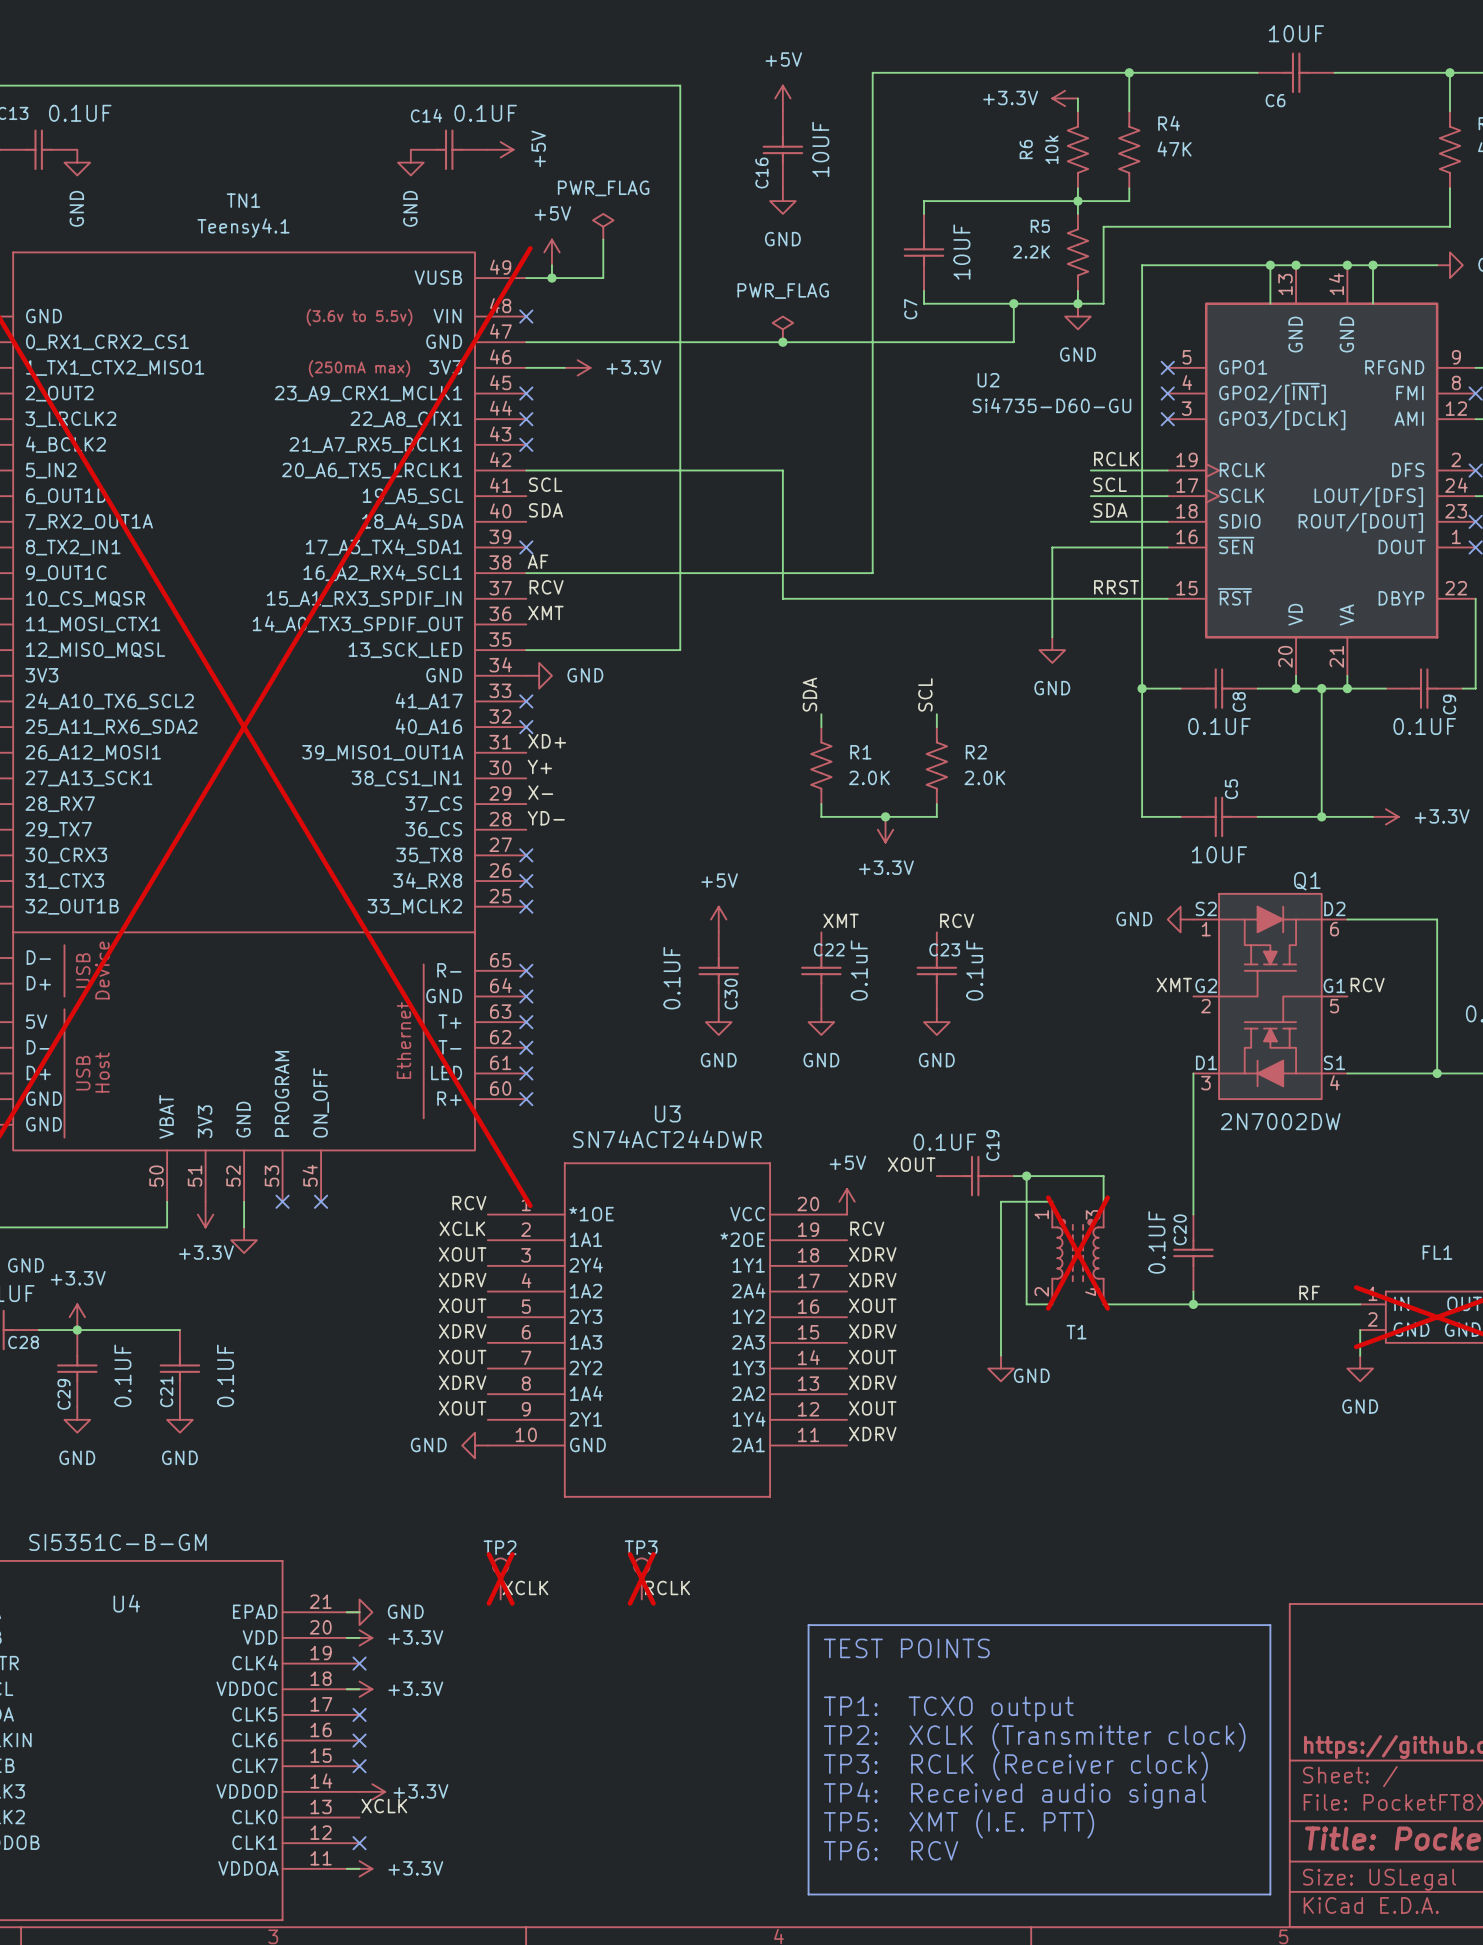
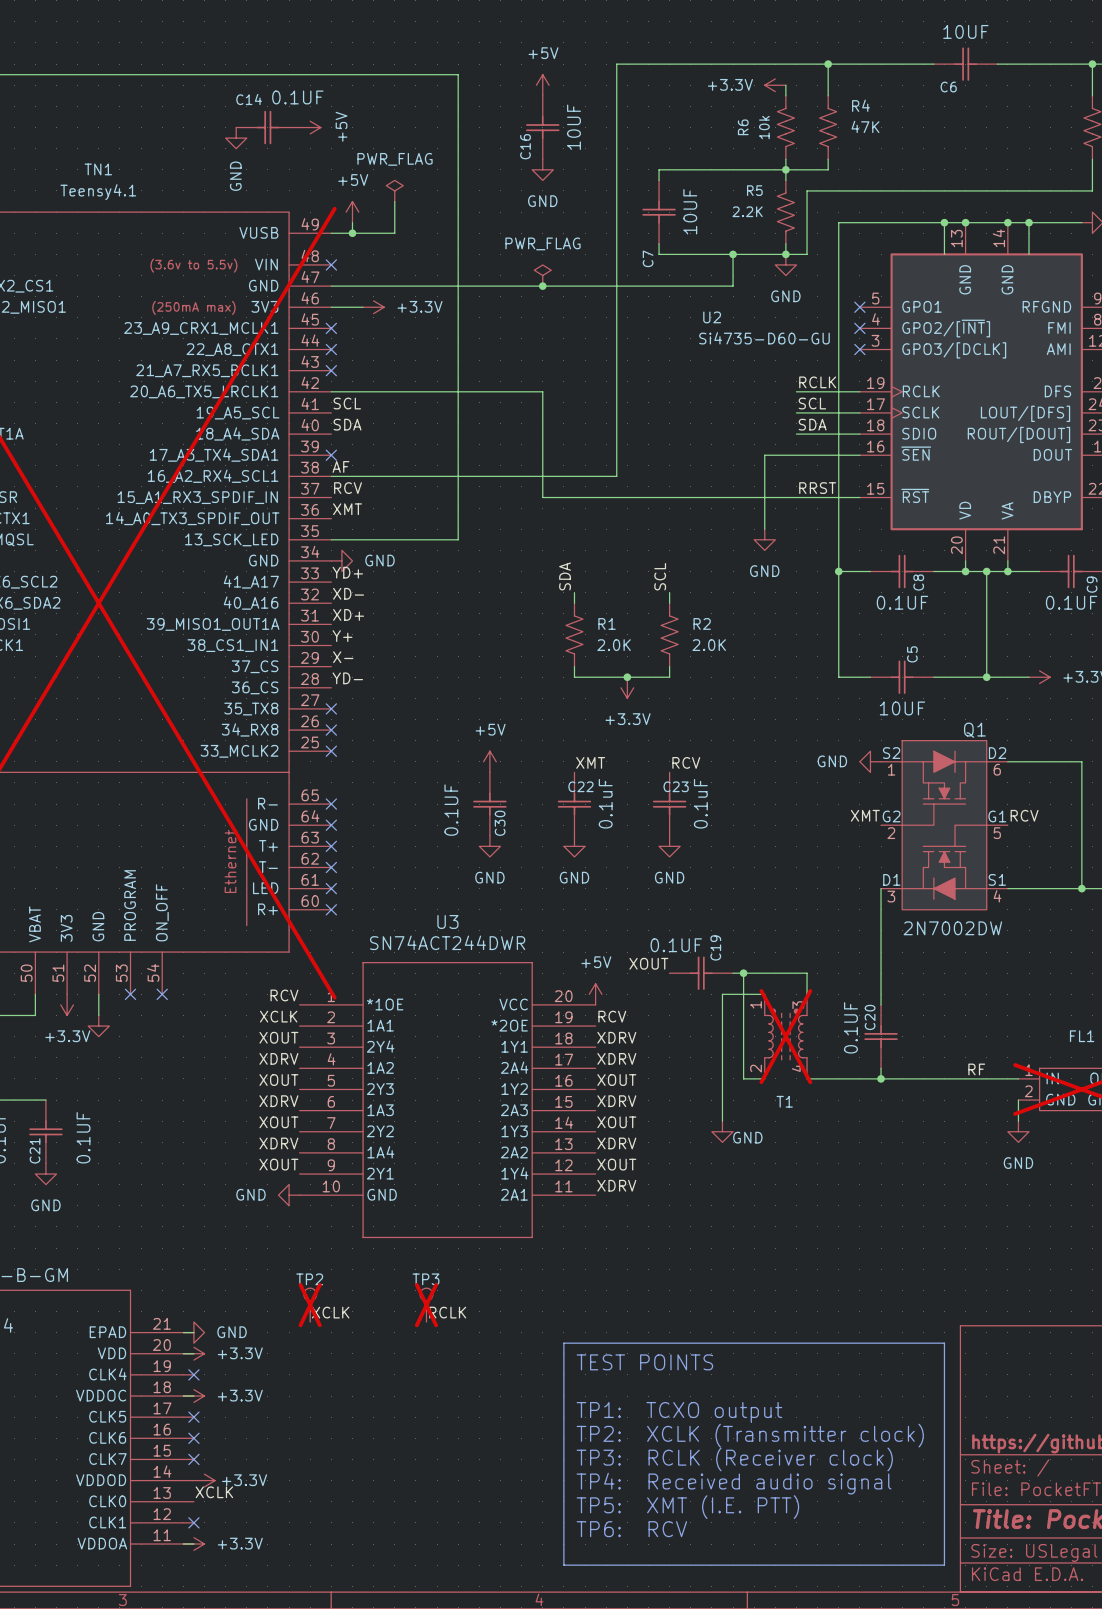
label: none -> YD+ (347, 572)
no-connect mark: (526, 701) -> none
label: none -> XD- (348, 593)
no-connect mark: (526, 727) -> none

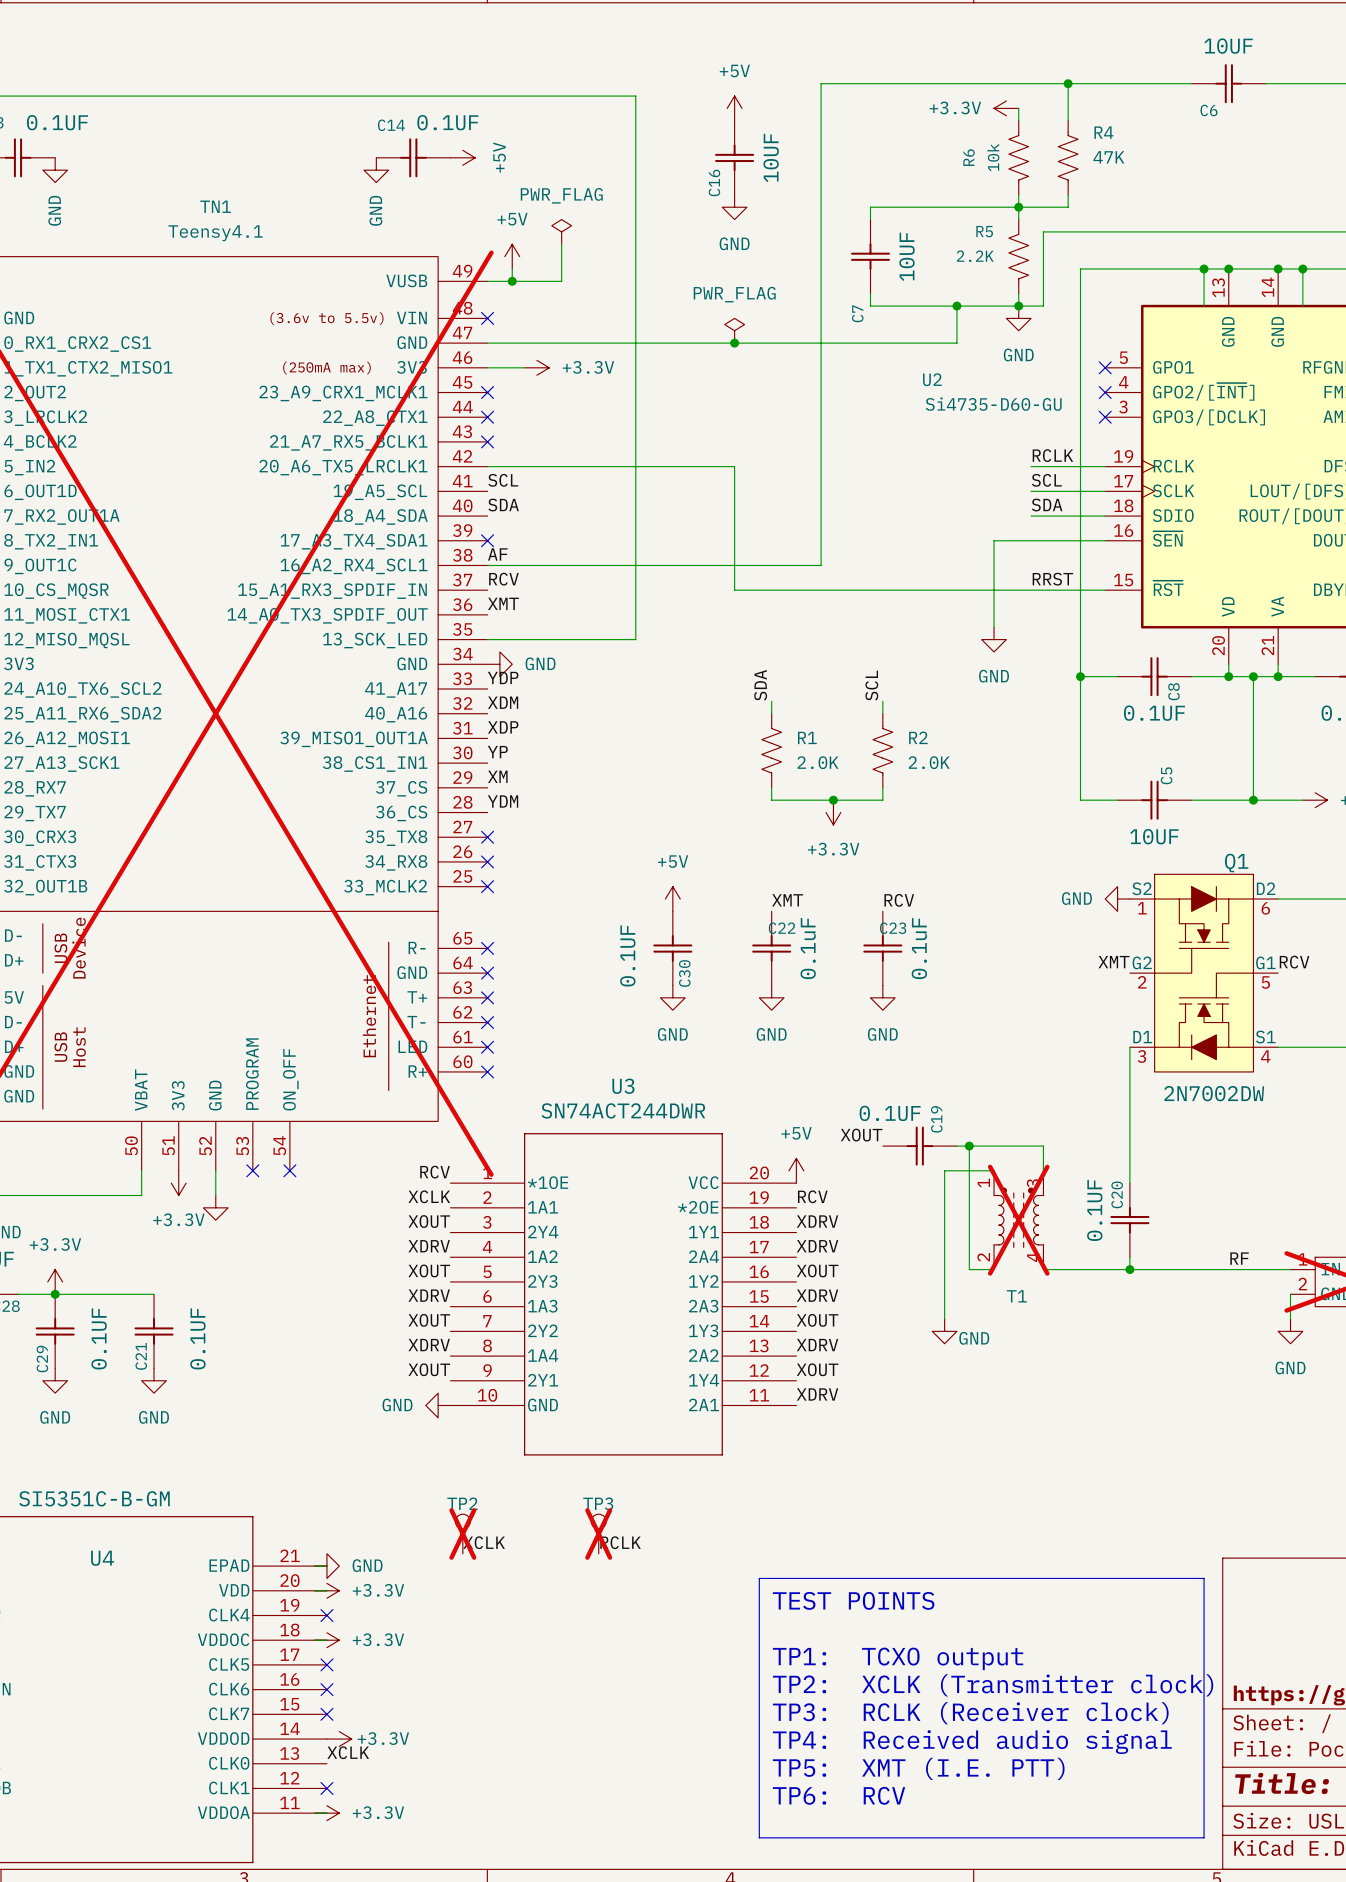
label: YD+ (347, 572) -> YDP (503, 677)
label: XD- (348, 593) -> XDM (503, 702)
label: XD+ (348, 614) -> XDP (503, 727)
label: Y+ (342, 636) -> YP (497, 752)
label: X- (343, 657) -> XM (497, 776)
label: YD- (347, 678) -> YDM (503, 801)

